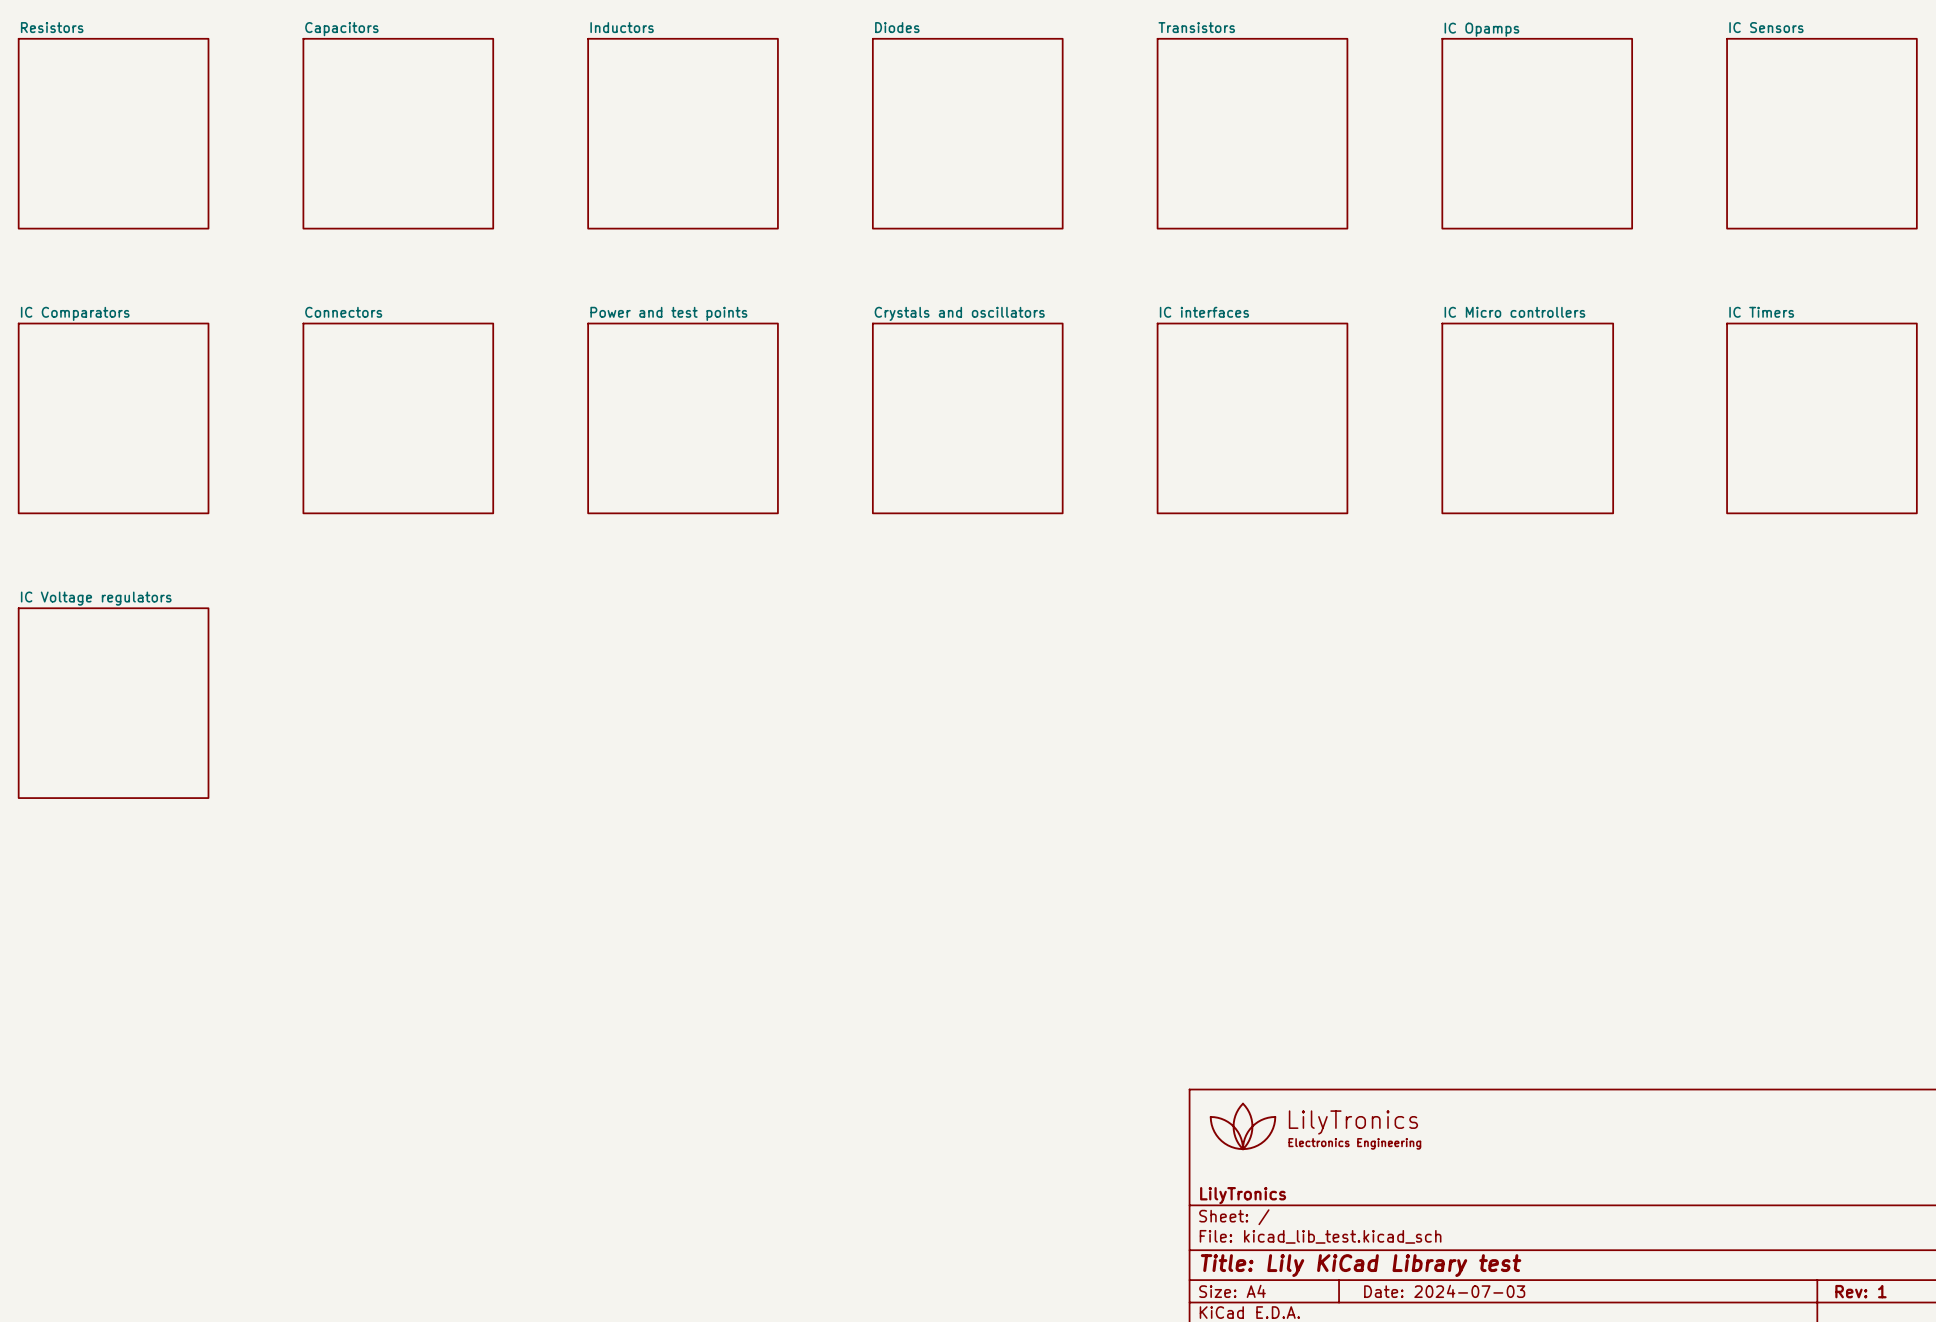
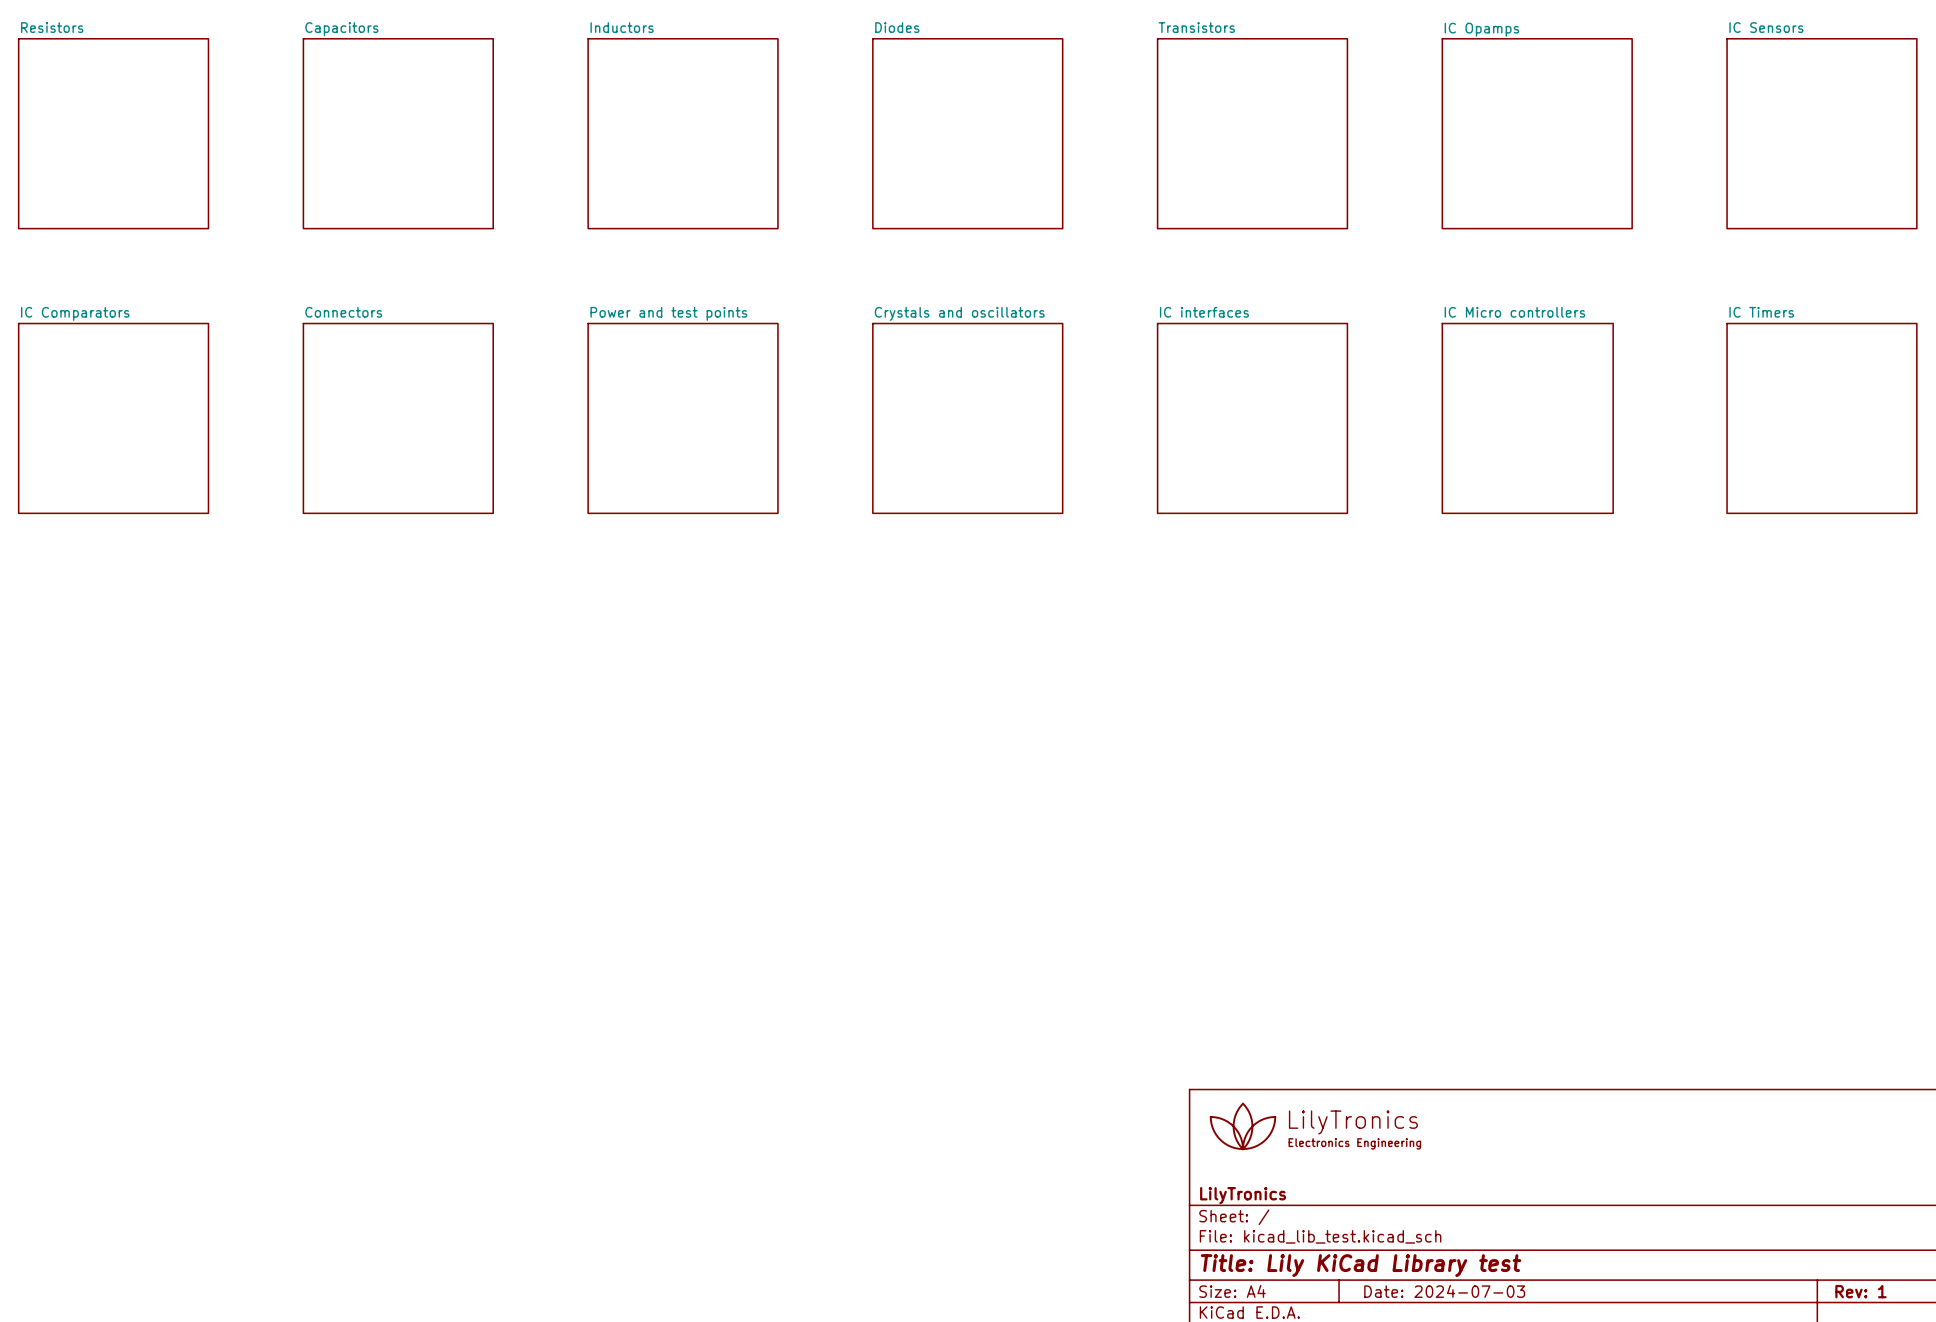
sheet IC Voltage regulators: (113, 703) -> none

